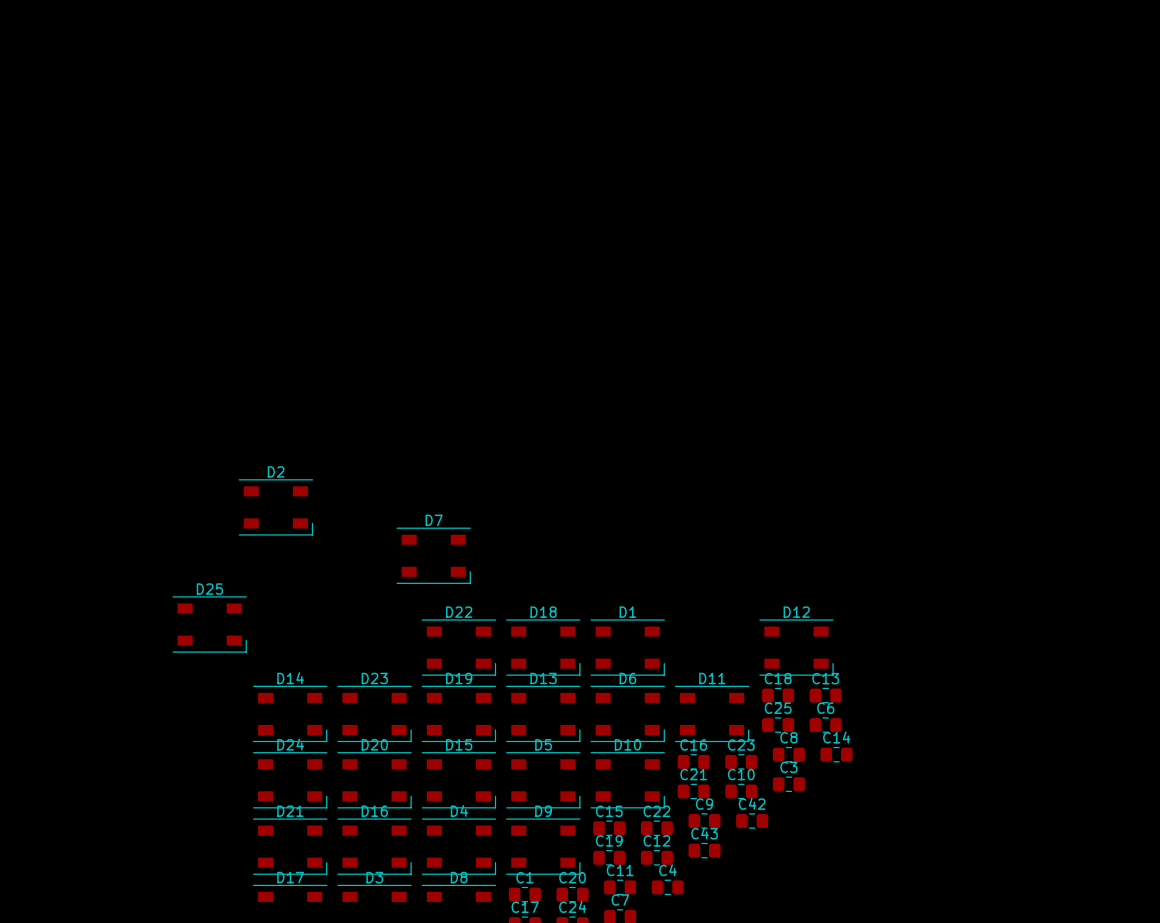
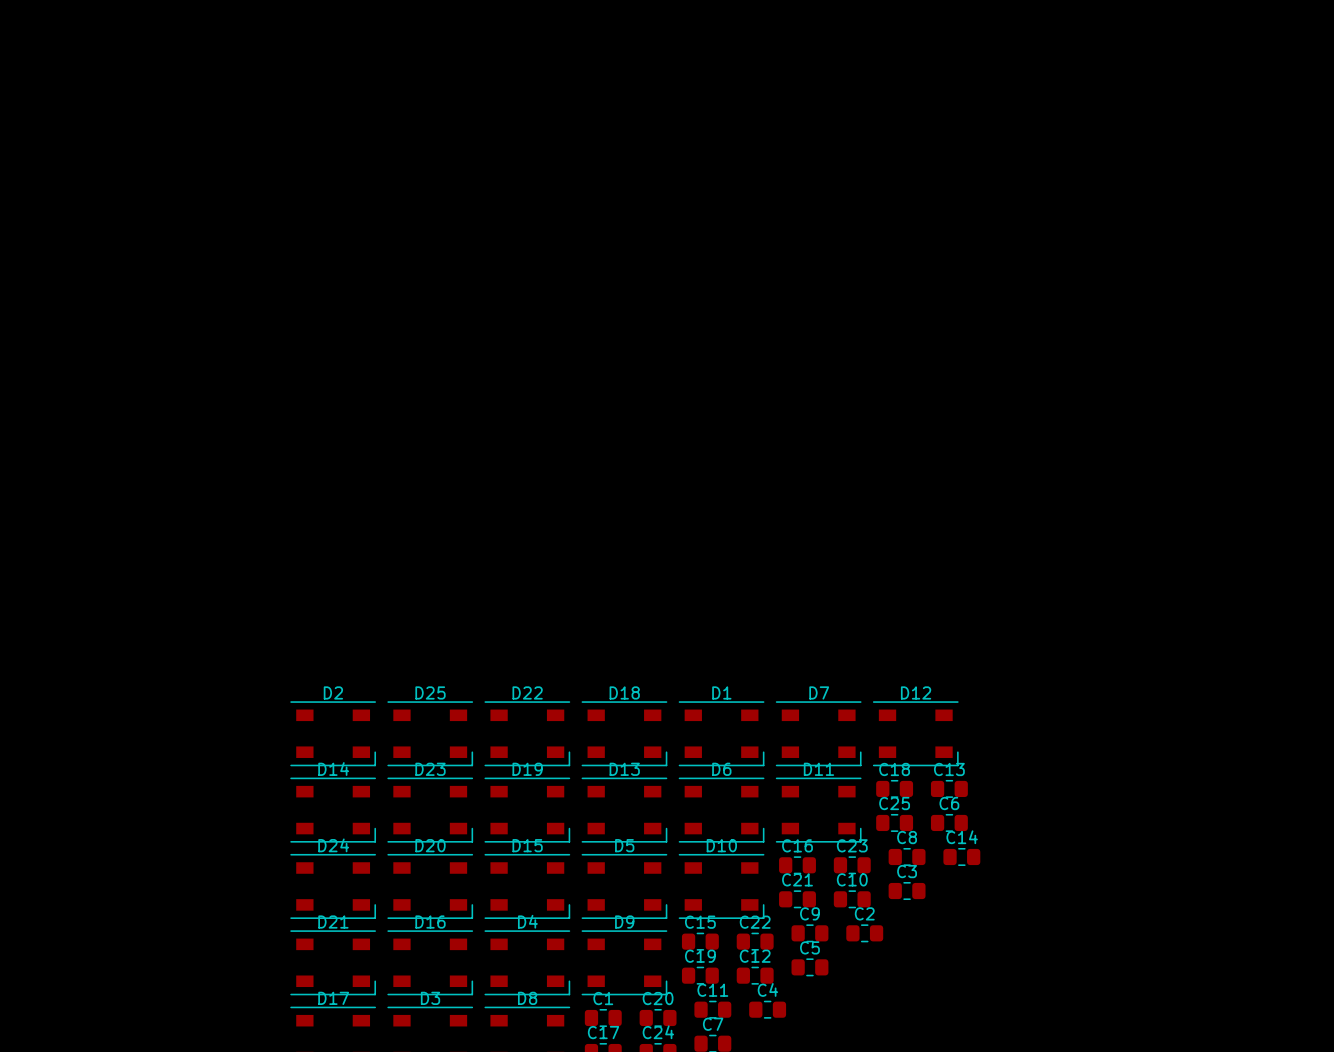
D2 position: (275, 507) -> (333, 733)
D7 position: (433, 555) -> (818, 733)
D25 position: (209, 624) -> (430, 733)
C42 name: C42 (752, 803) -> C2 (864, 913)
C43 name: C43 (704, 833) -> C5 (809, 947)

